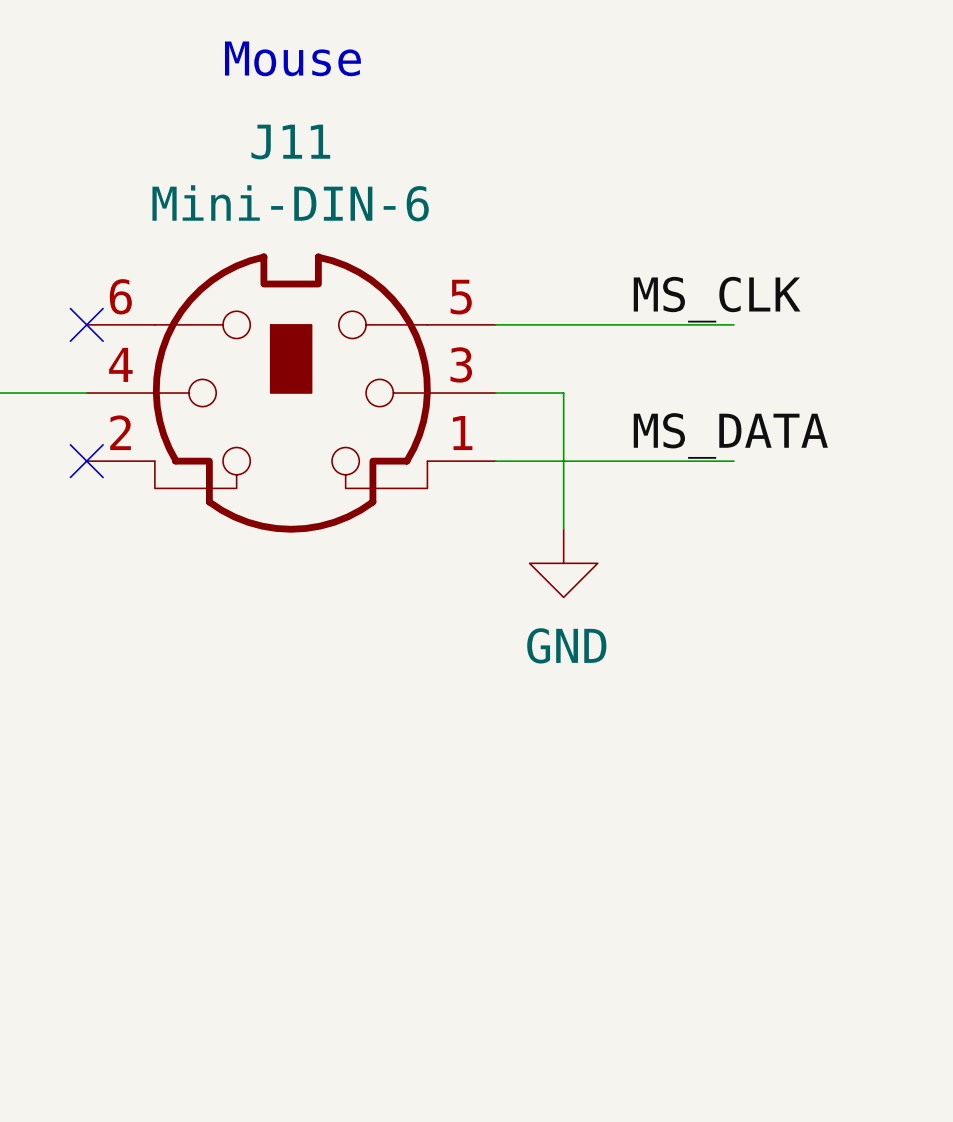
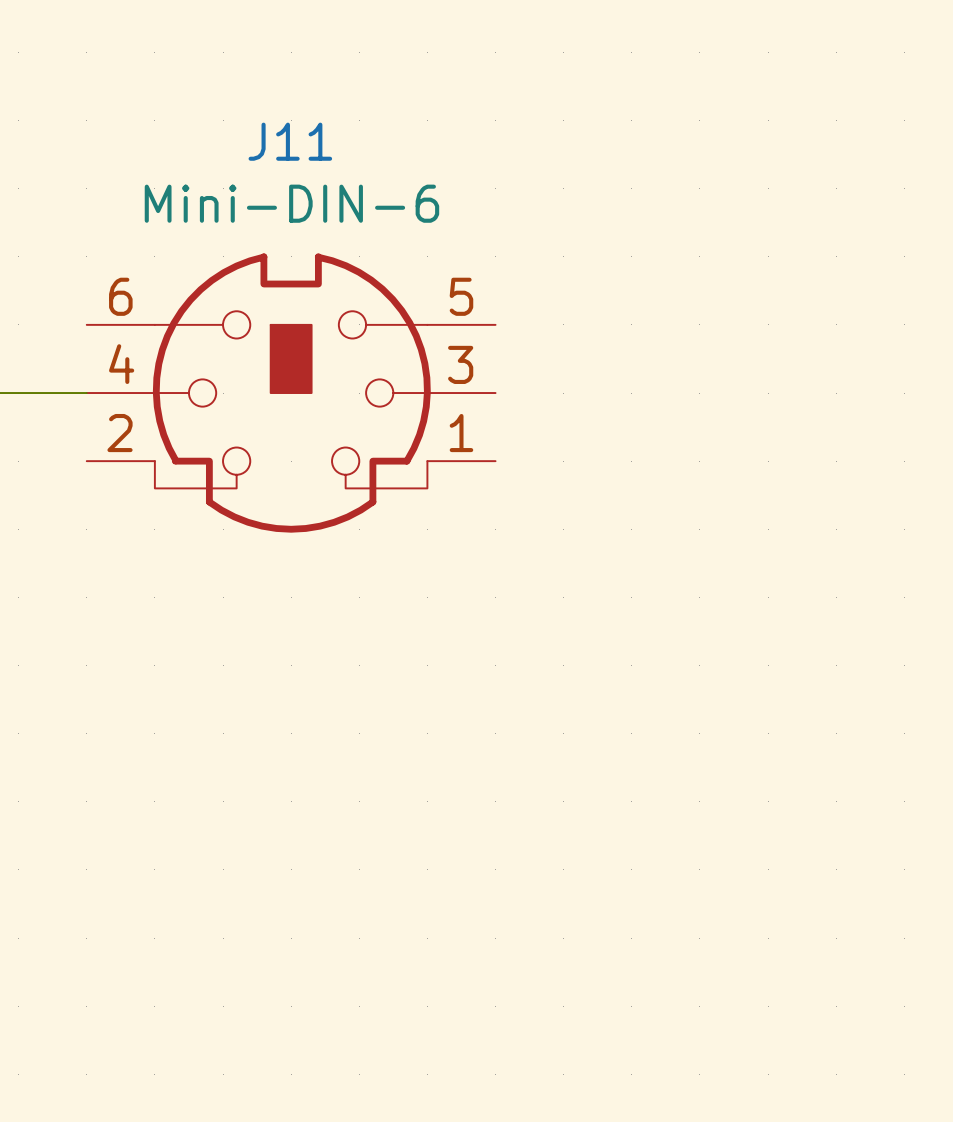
text: Mouse (292, 58) -> none
label: MS_CLK (717, 299) -> none
no-connect mark: (86, 324) -> none
wire: (495, 324) (733, 324) -> none
wire: (495, 393) (563, 393) (563, 529) -> none
label: MS_DATA (730, 435) -> none
no-connect mark: (86, 461) -> none
wire: (495, 461) (733, 461) -> none
power symbol: GND (563, 563) -> none

